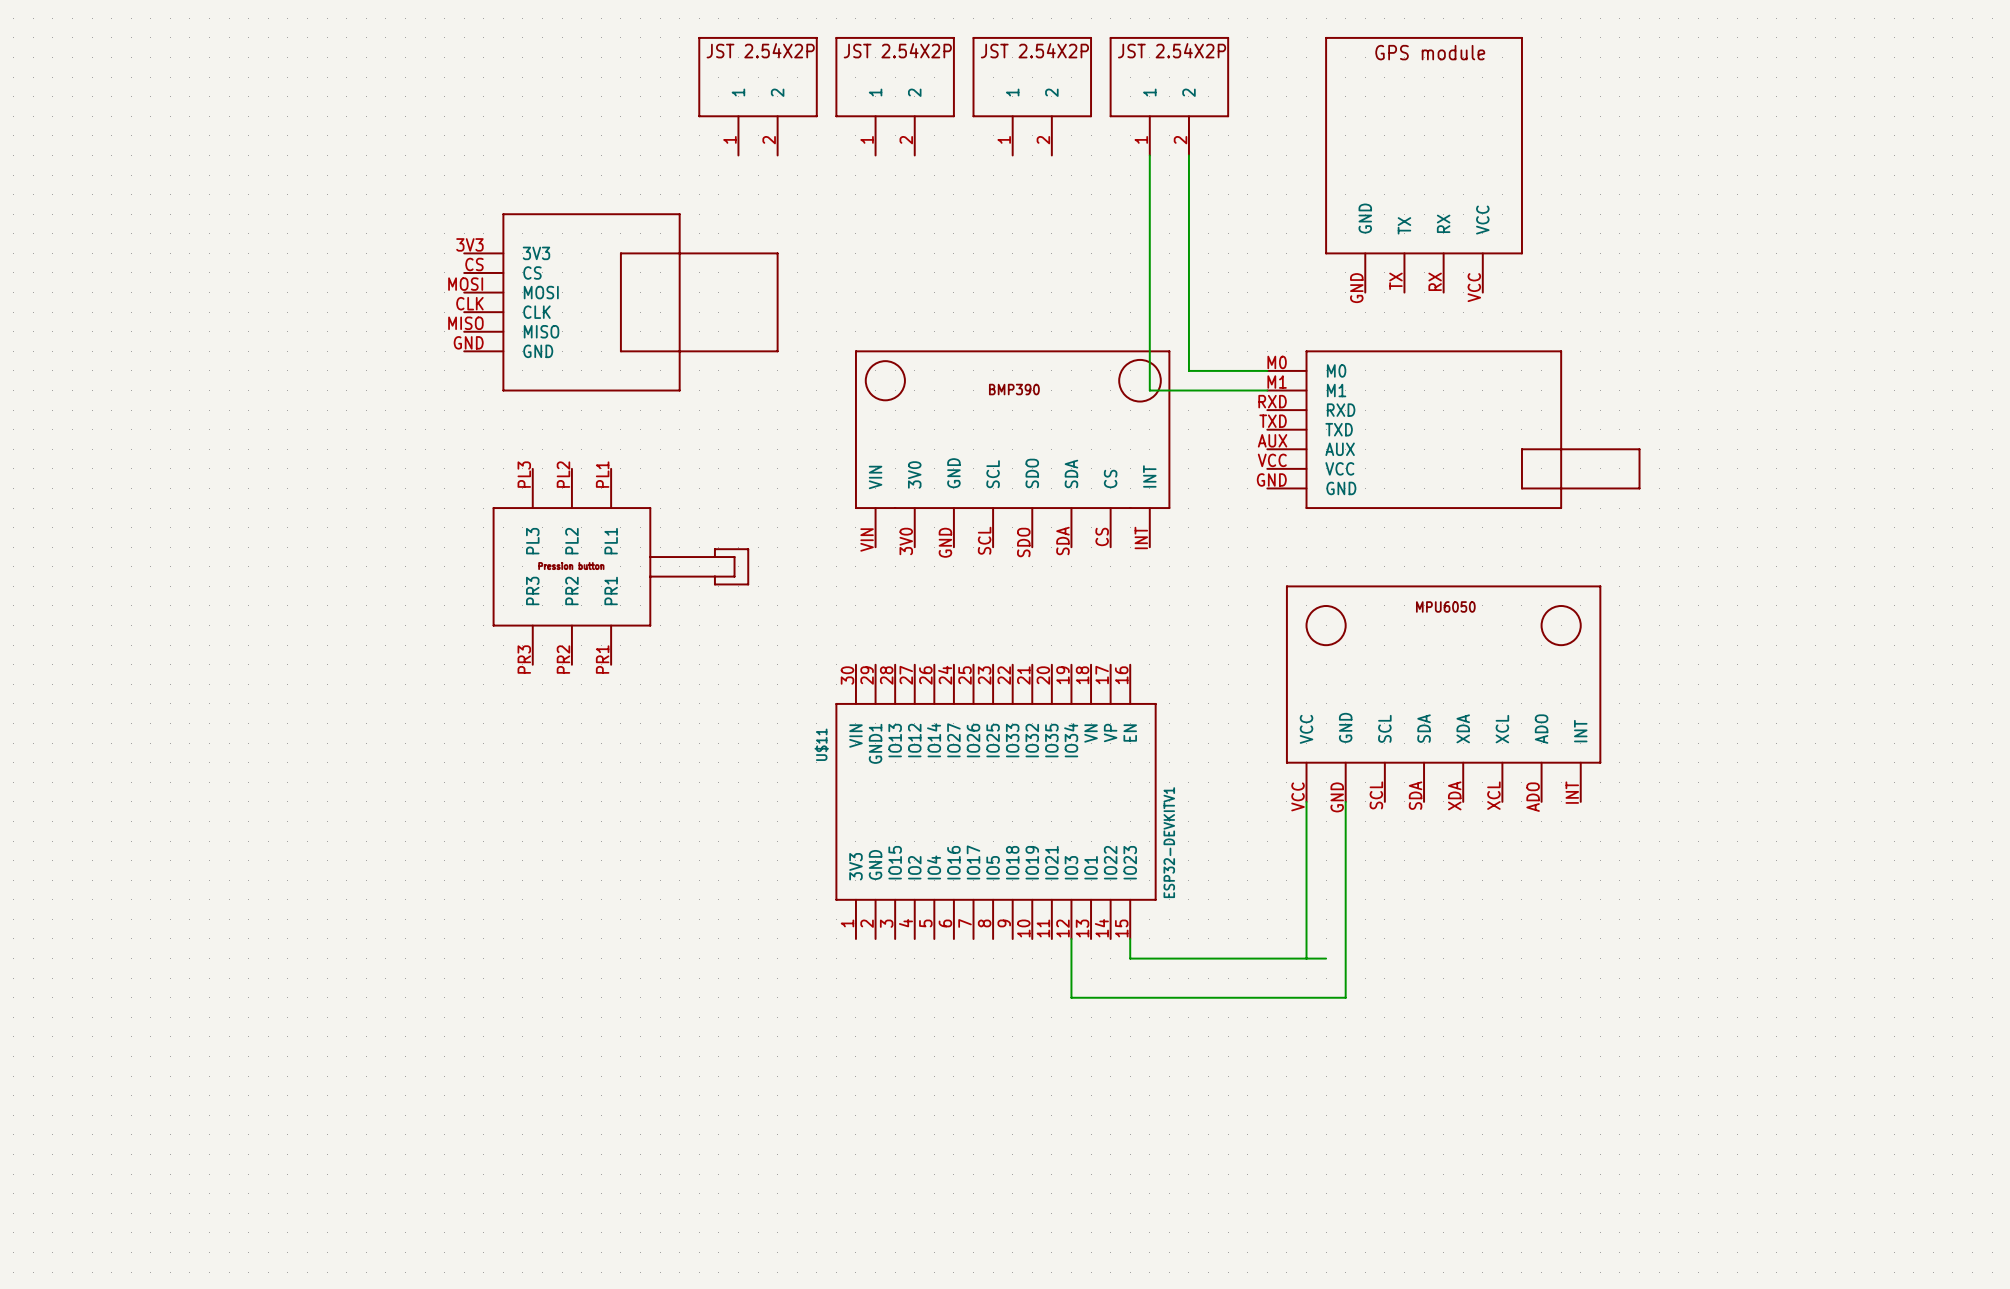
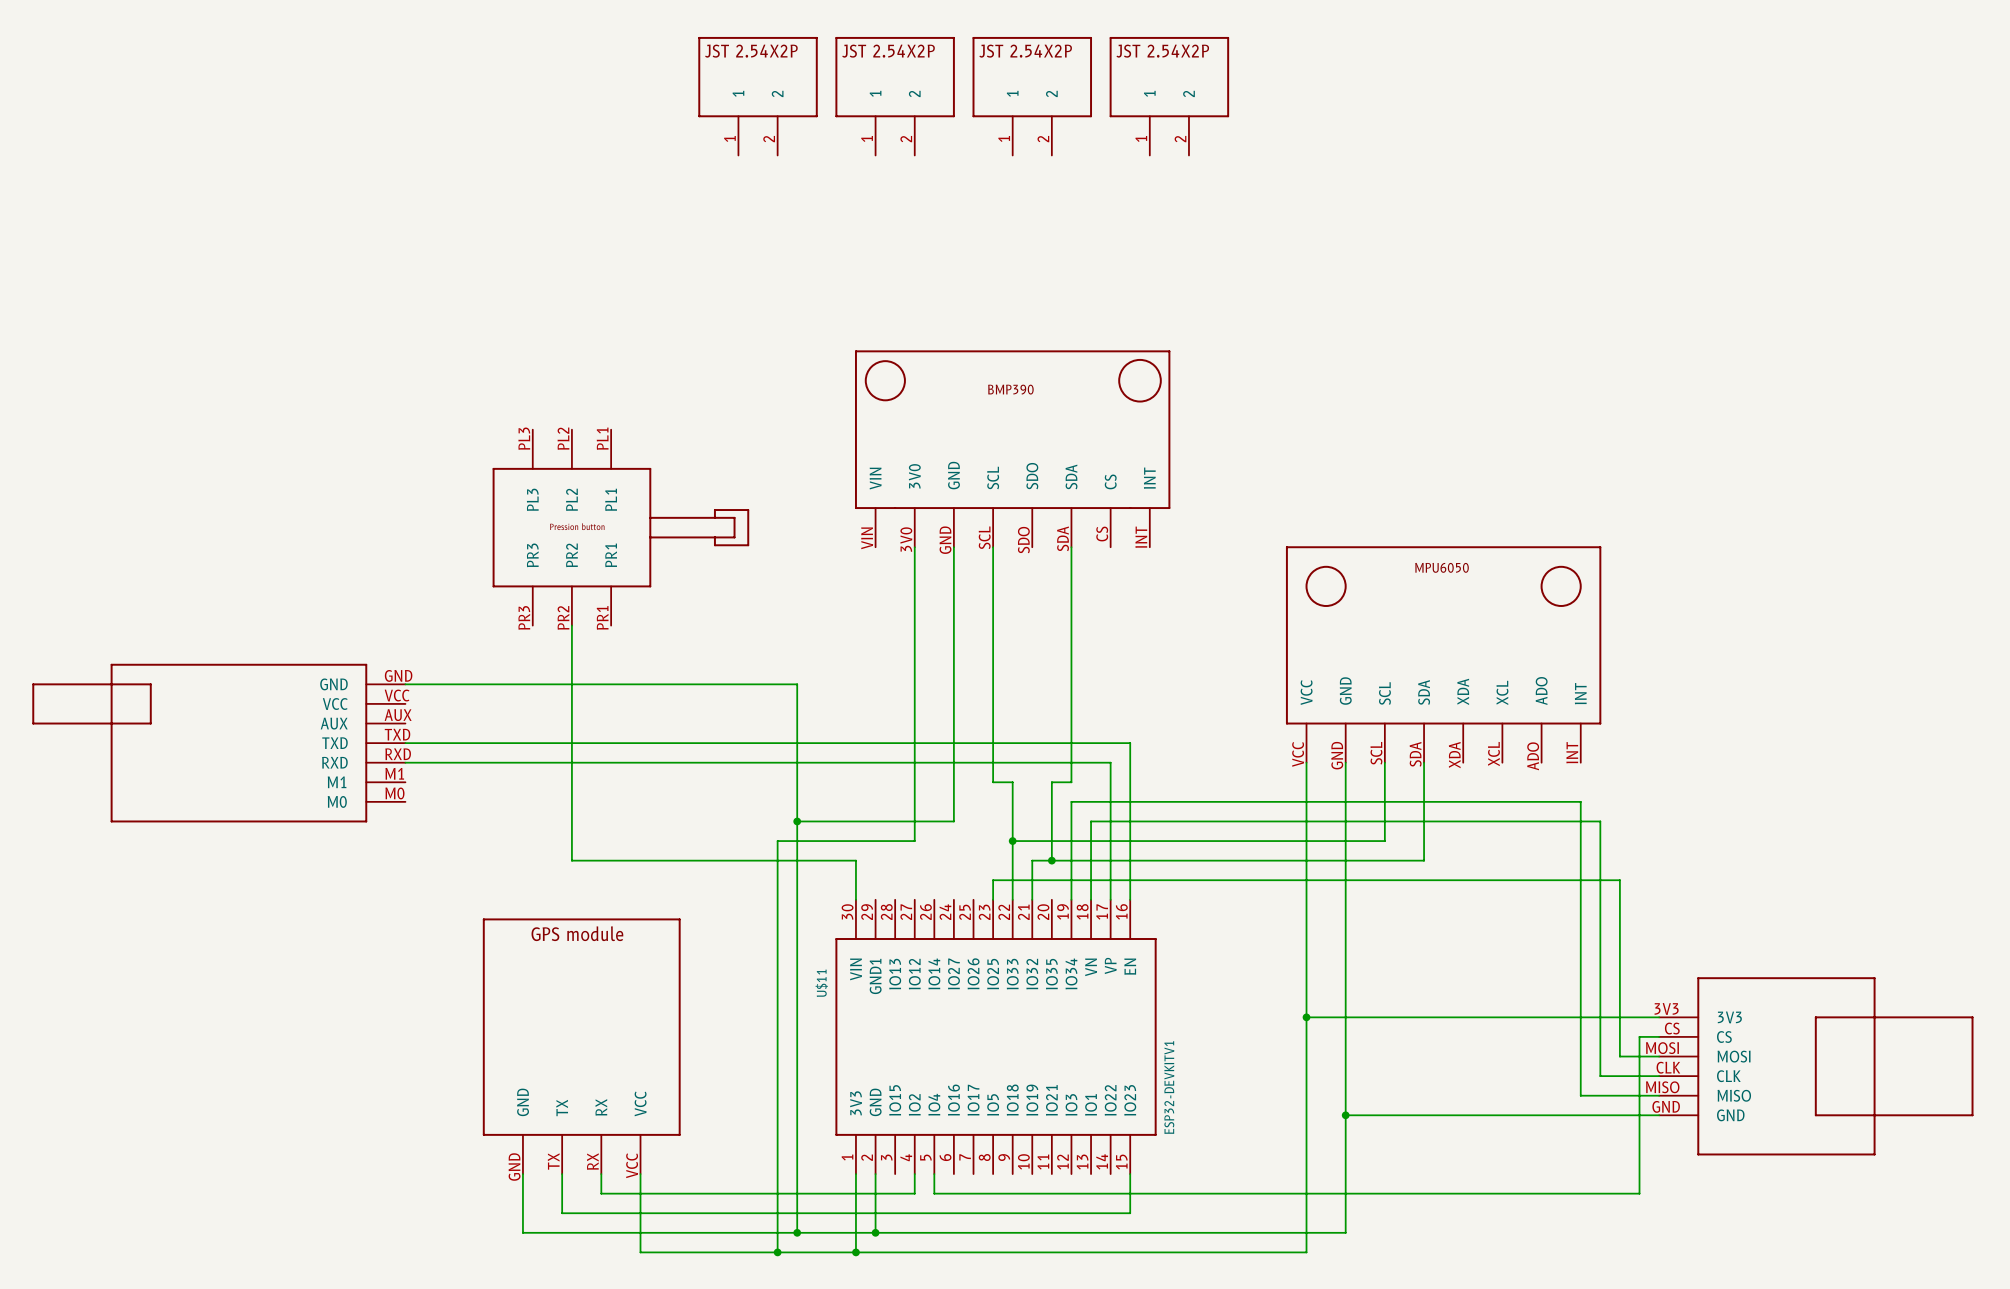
wire: (1149, 155) (1149, 390) (1267, 390) -> none
wire: (1188, 155) (1188, 370) (1267, 370) -> none
part: (1424, 164) -> none
part: (621, 302) -> none
part: (1453, 429) -> none
wire: none -> (914, 547) (914, 841) (777, 841) (777, 1252)
wire: none -> (953, 547) (953, 821) (797, 821)
wire: none -> (993, 547) (993, 782) (1012, 782) (1012, 899)
wire: none -> (1071, 547) (1071, 782) (1051, 782) (1051, 860)
part position: (620, 566) -> (620, 527)
wire: none -> (571, 625) (571, 860) (855, 860) (855, 899)
wire: none -> (405, 684) (797, 684) (797, 1232)
part position: (1443, 693) -> (1443, 654)
part: none -> (218, 743)
wire: none -> (405, 743) (1130, 743) (1130, 899)
wire: none -> (405, 762) (1110, 762) (1110, 899)
wire: none -> (1384, 762) (1384, 841) (1012, 841)
wire: none -> (1424, 762) (1424, 860) (1032, 860) (1032, 899)
U$11 position: (996, 801) -> (996, 1036)
junction: none -> (797, 821)
junction: none -> (1012, 841)
junction: none -> (1051, 860)
wire: none -> (993, 899) (993, 880) (1619, 880) (1619, 1056) (1659, 1056)
wire: none -> (1071, 899) (1071, 801) (1580, 801) (1580, 1095) (1659, 1095)
wire: none -> (1091, 899) (1091, 821) (1600, 821) (1600, 1076) (1659, 1076)
wire: (1071, 938) (1071, 997) (1345, 997) -> (522, 1174) (522, 1232) (1345, 1232) (1345, 997)
wire: (1130, 938) (1130, 958) (1326, 958) -> none
wire: none -> (1306, 958) (1306, 1252) (640, 1252) (640, 1174)
wire: none -> (1306, 1017) (1659, 1017)
junction: none -> (1306, 1017)
wire: none -> (1659, 1036) (1639, 1036) (1639, 1193) (934, 1193) (934, 1174)
part: none -> (581, 1046)
part: none -> (1816, 1066)
wire: none -> (1345, 1115) (1659, 1115)
junction: none -> (1345, 1115)
wire: none -> (562, 1174) (562, 1213) (1130, 1213) (1130, 1174)
wire: none -> (601, 1174) (601, 1193) (914, 1193) (914, 1174)
wire: none -> (855, 1174) (855, 1252)
wire: none -> (875, 1174) (875, 1232)
junction: none -> (797, 1232)
junction: none -> (875, 1232)
junction: none -> (777, 1252)
junction: none -> (855, 1252)

